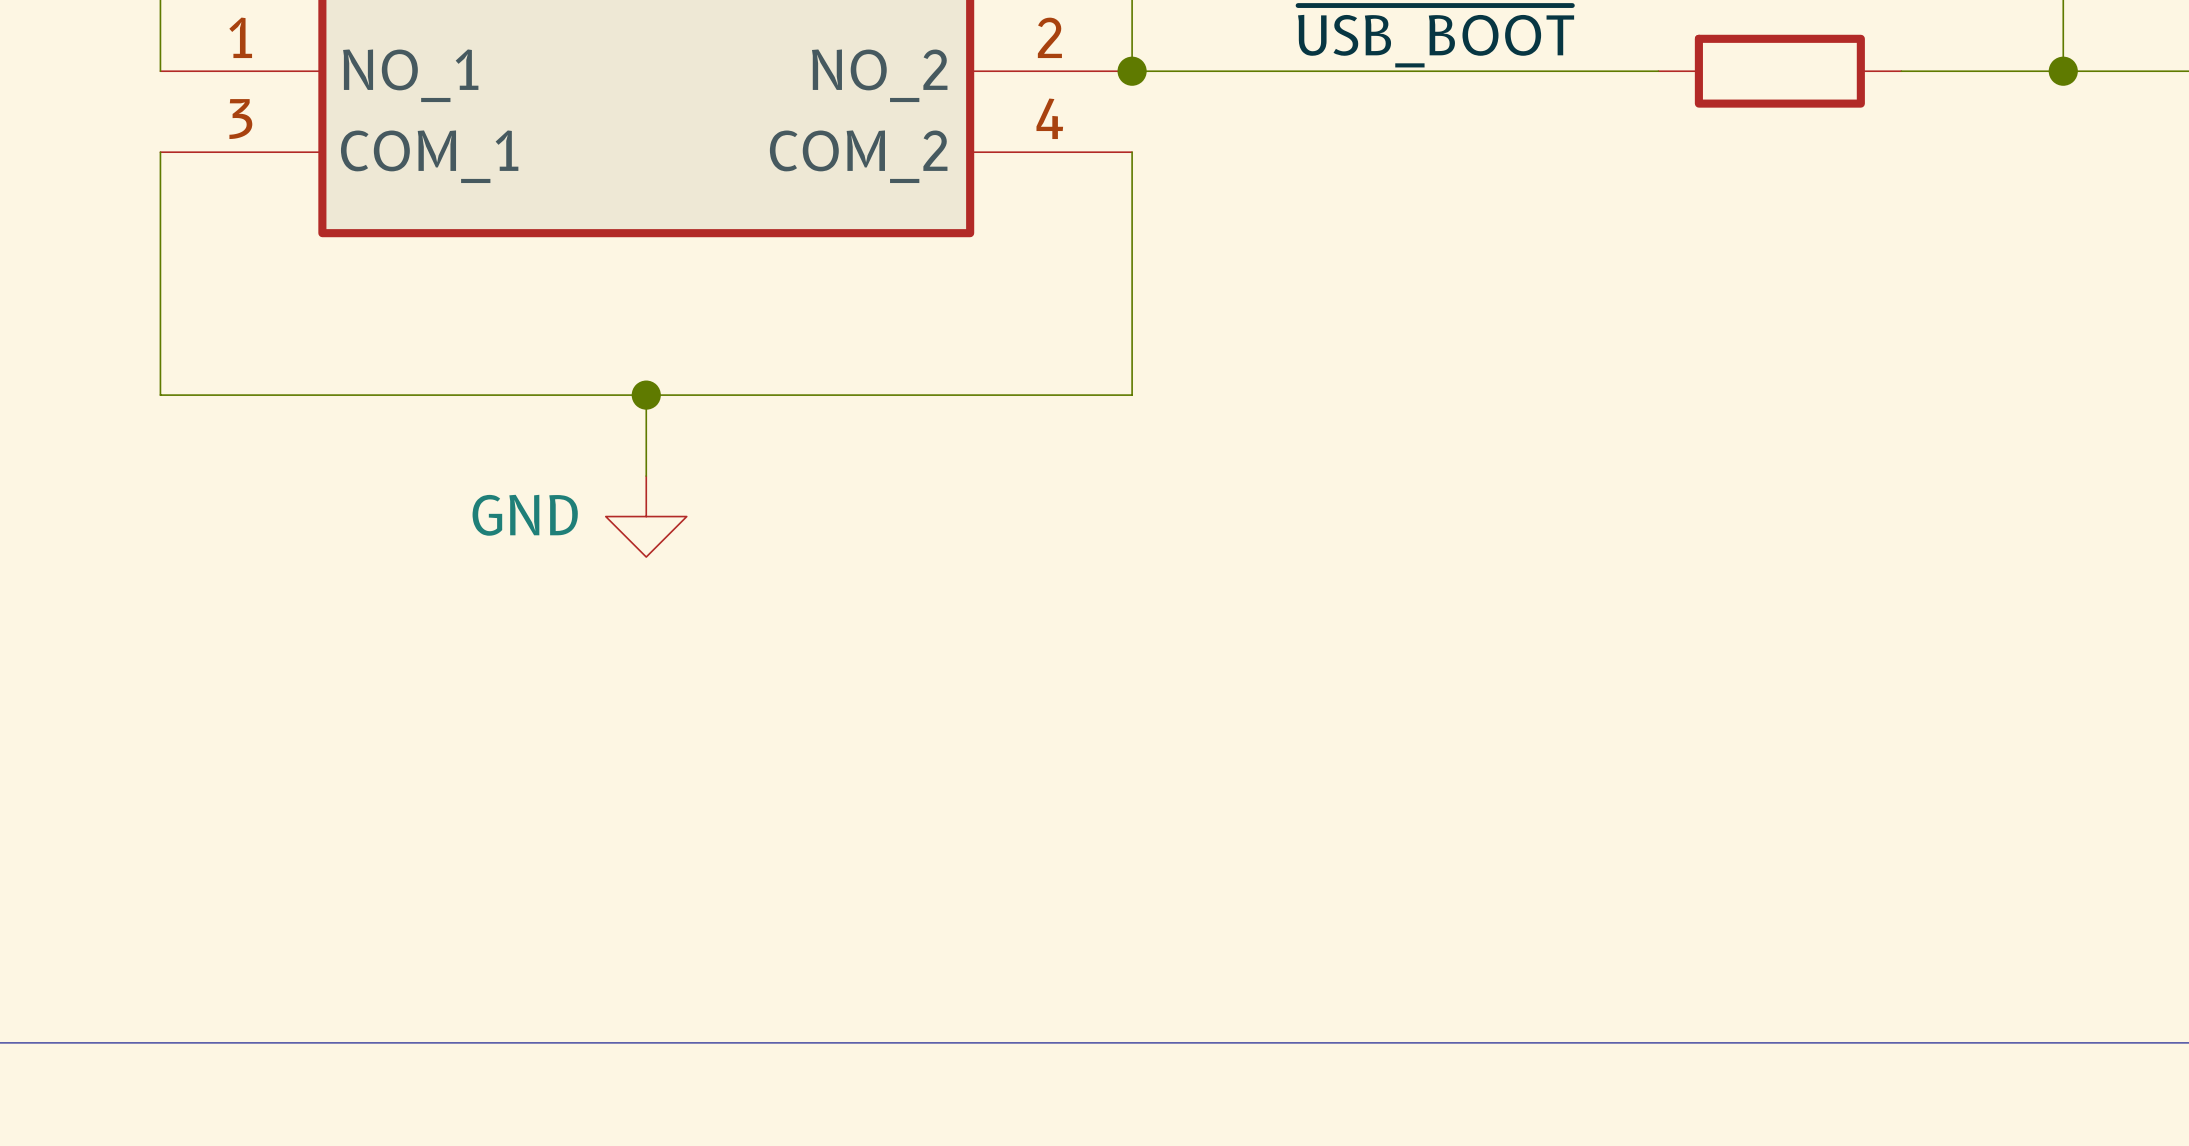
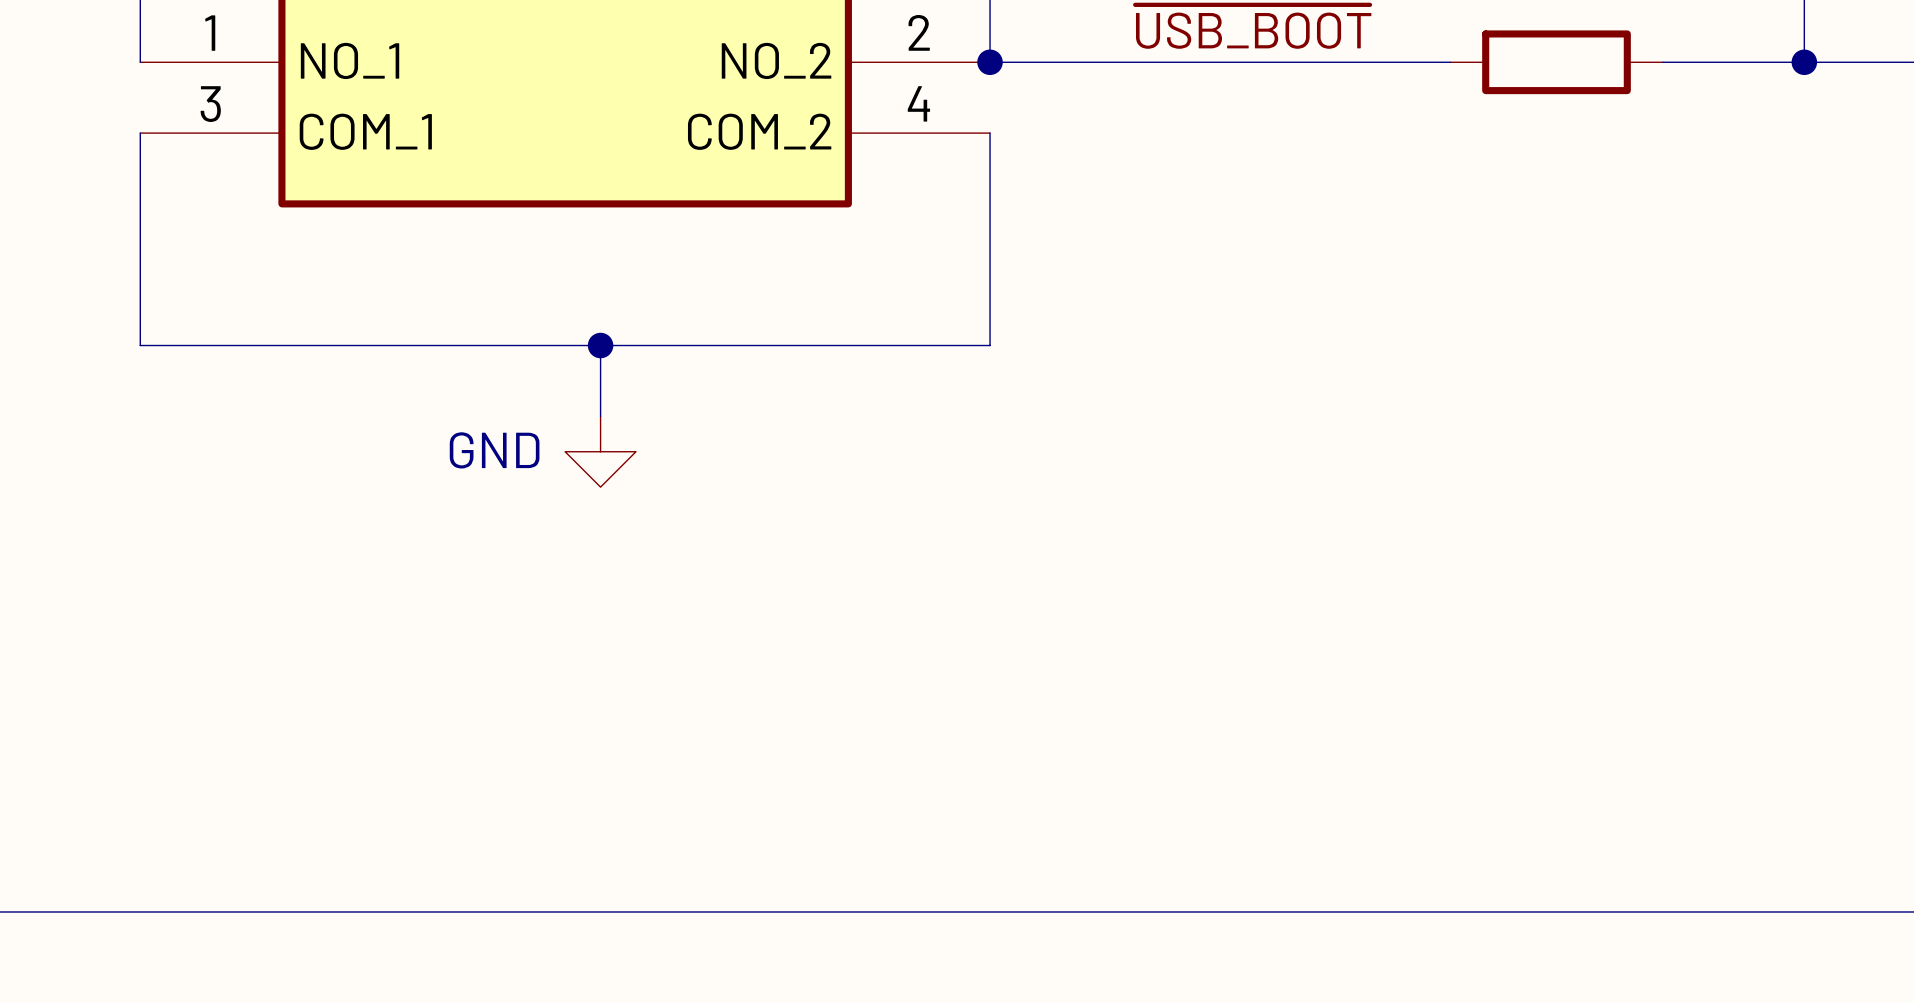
wire: (646, 395) (646, 476) -> (600, 345) (600, 416)
junction position: (646, 395) -> (600, 345)
power symbol position: GND (646, 516) -> GND (600, 451)

